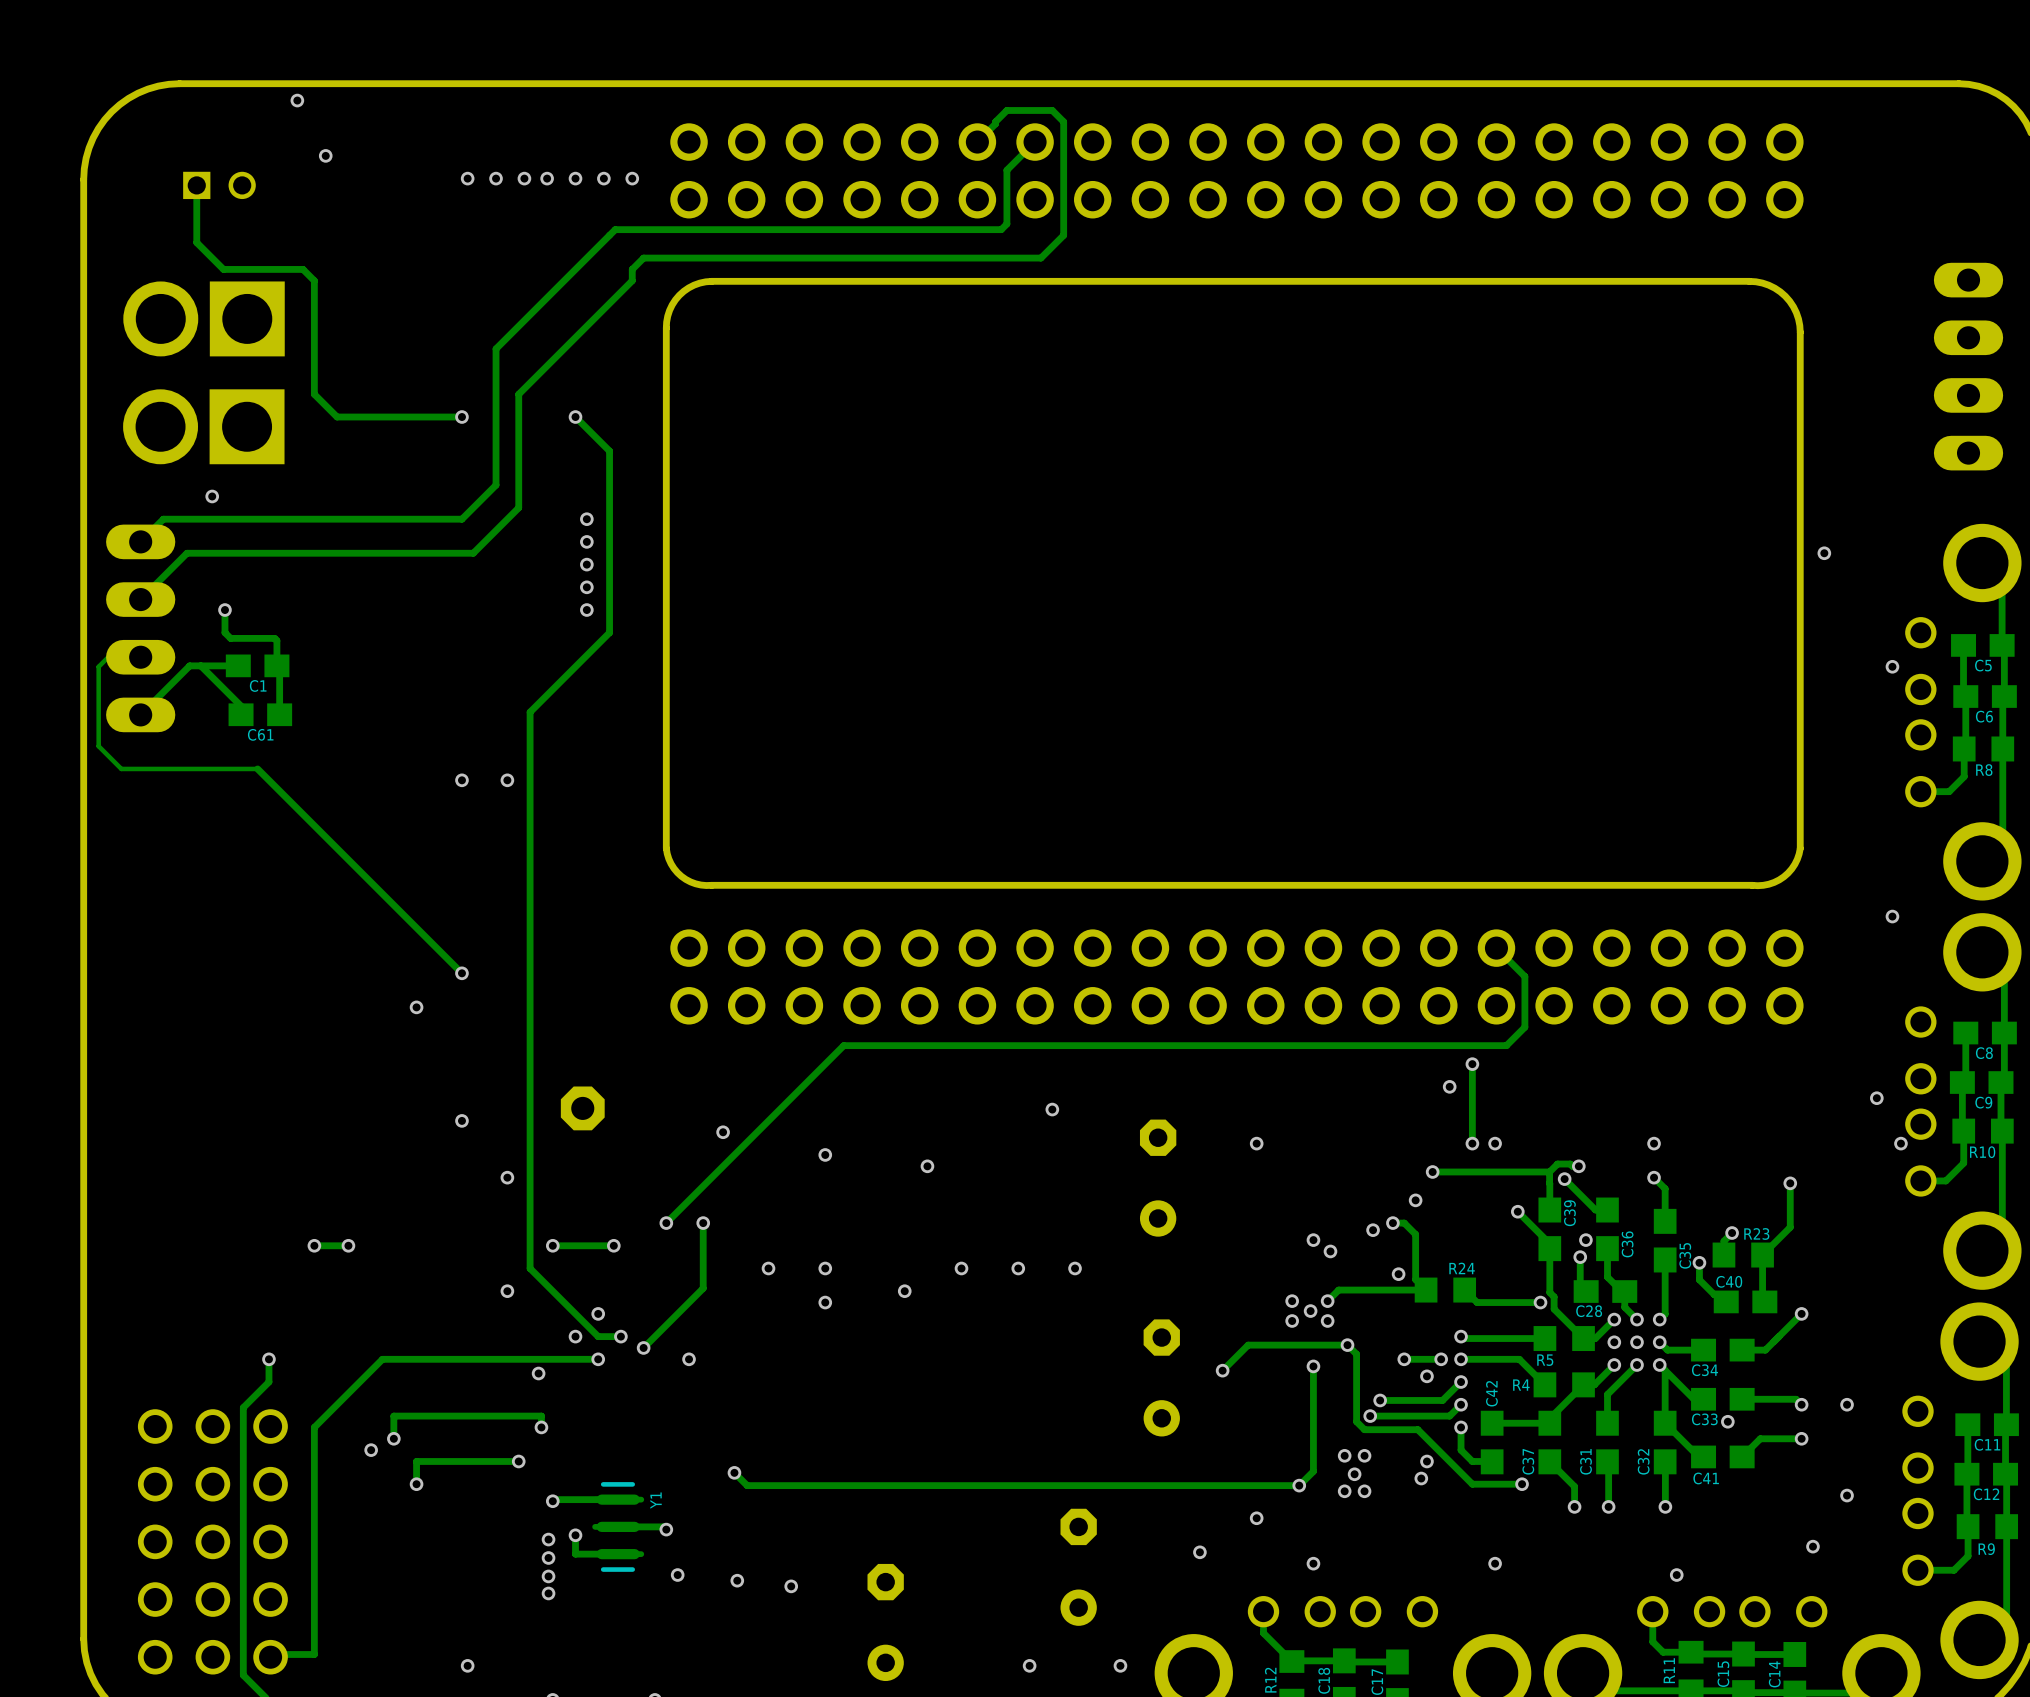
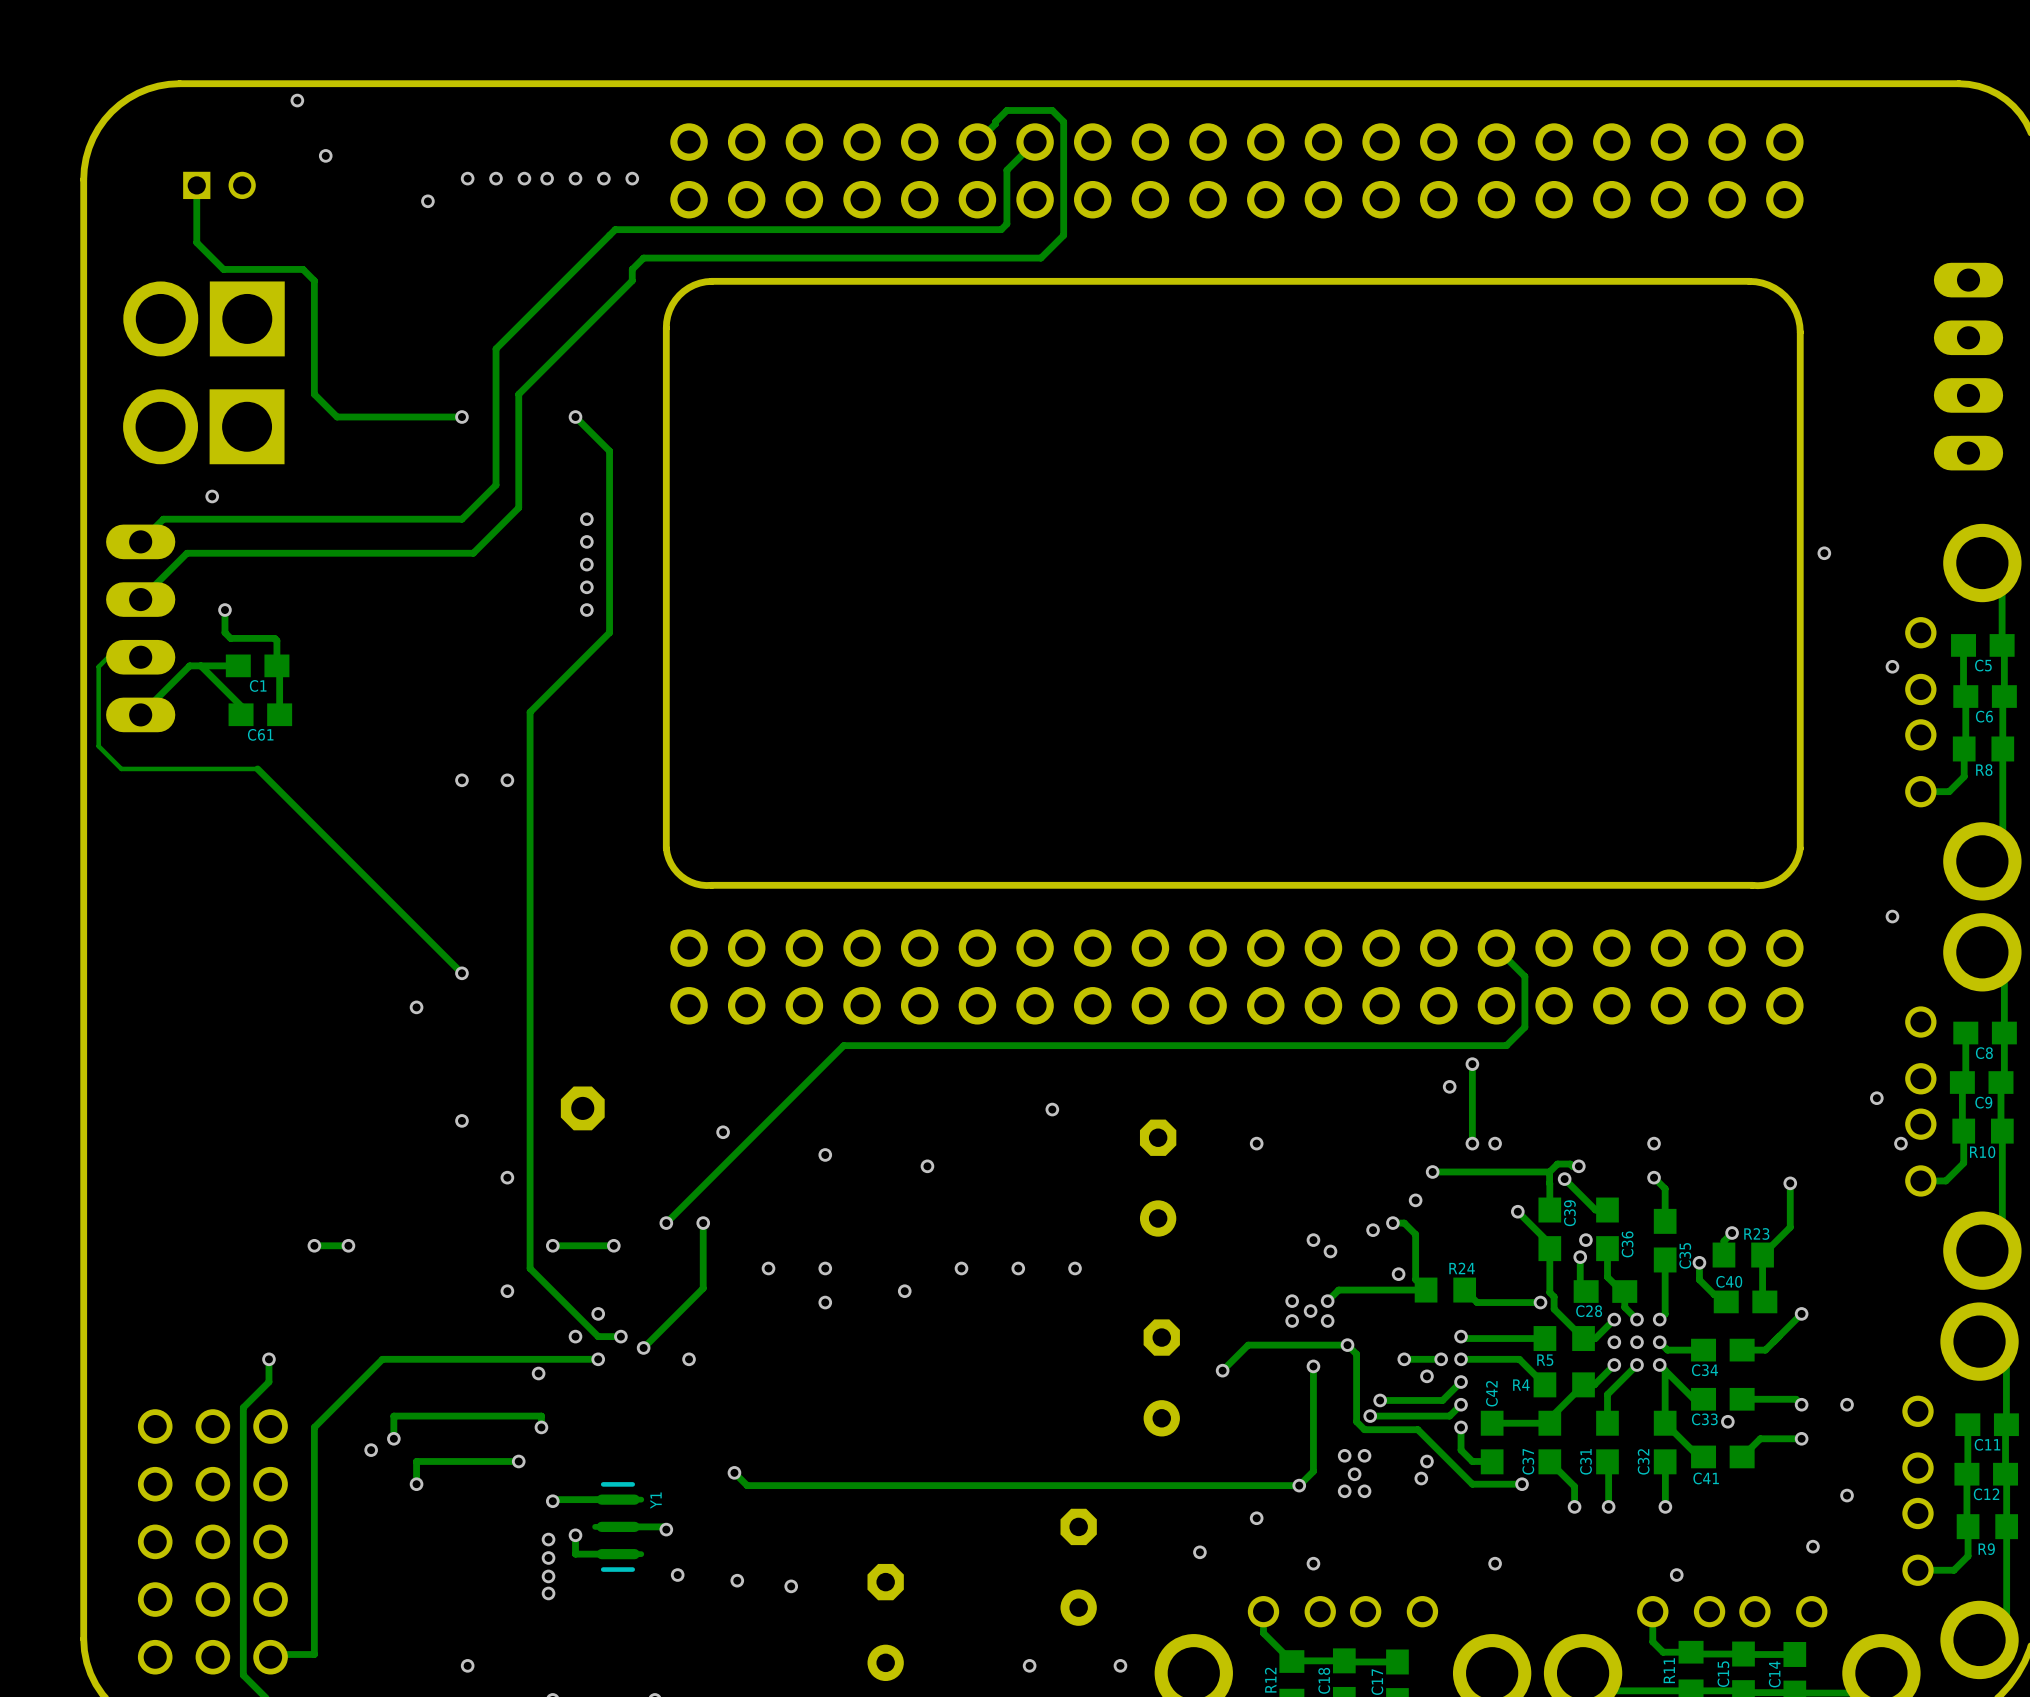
via: none -> (427, 201)

